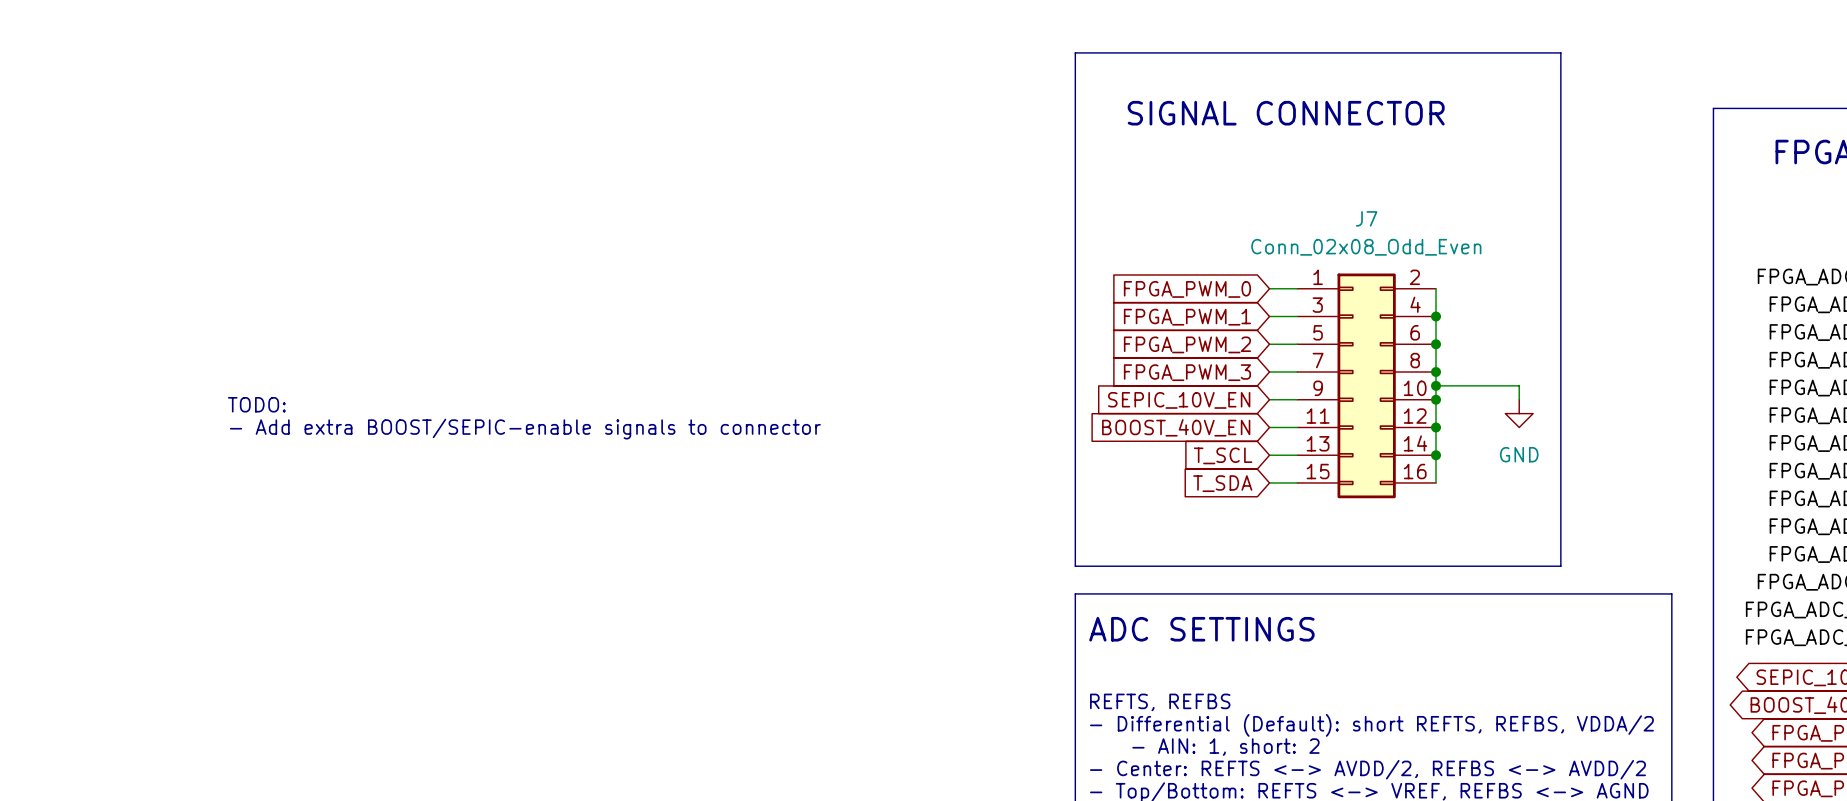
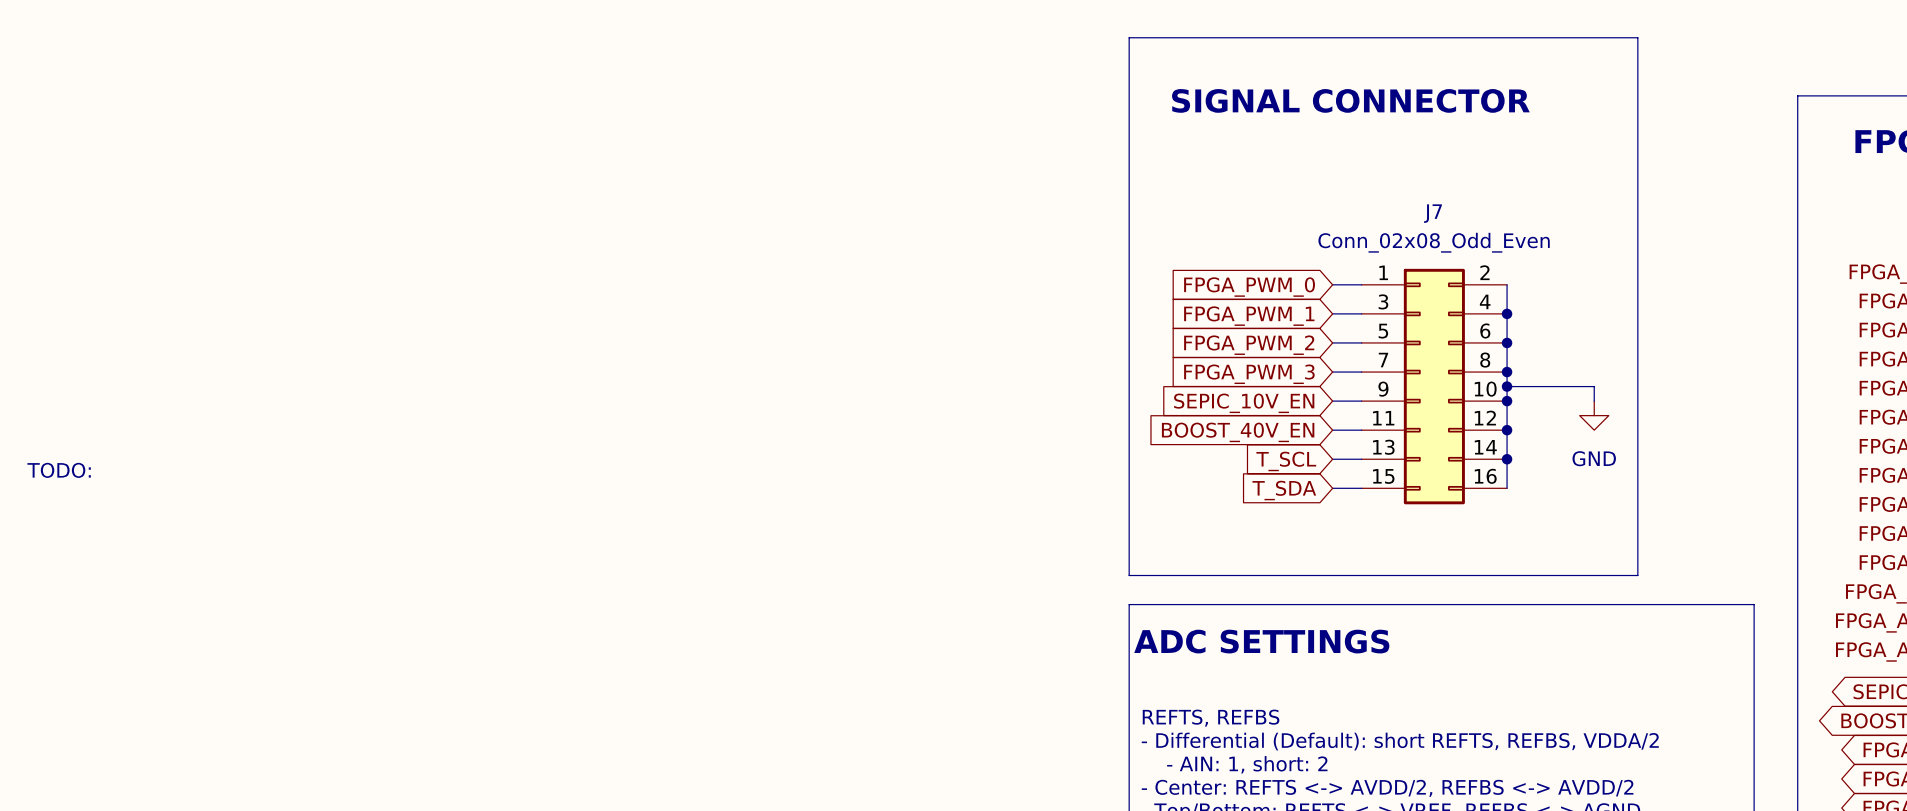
text position: TODO: (256, 404) -> TODO: (59, 470)
text: - Add extra BOOST/SEPIC-enable signals to connector (525, 429) -> none

